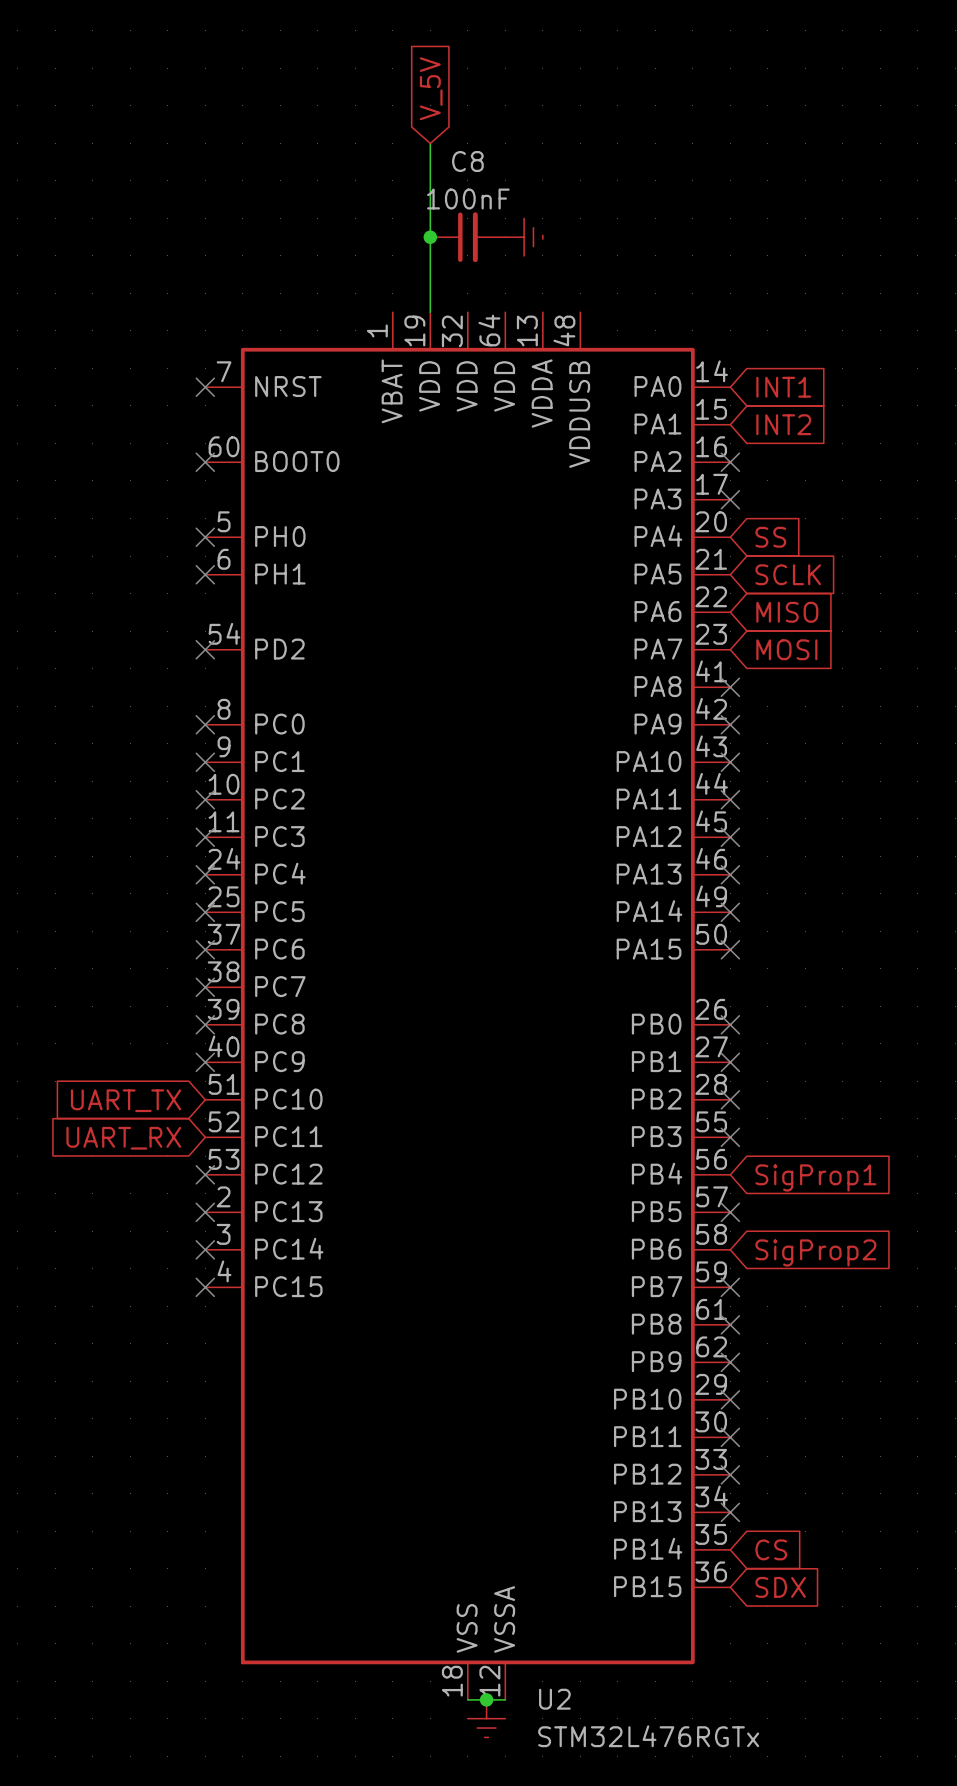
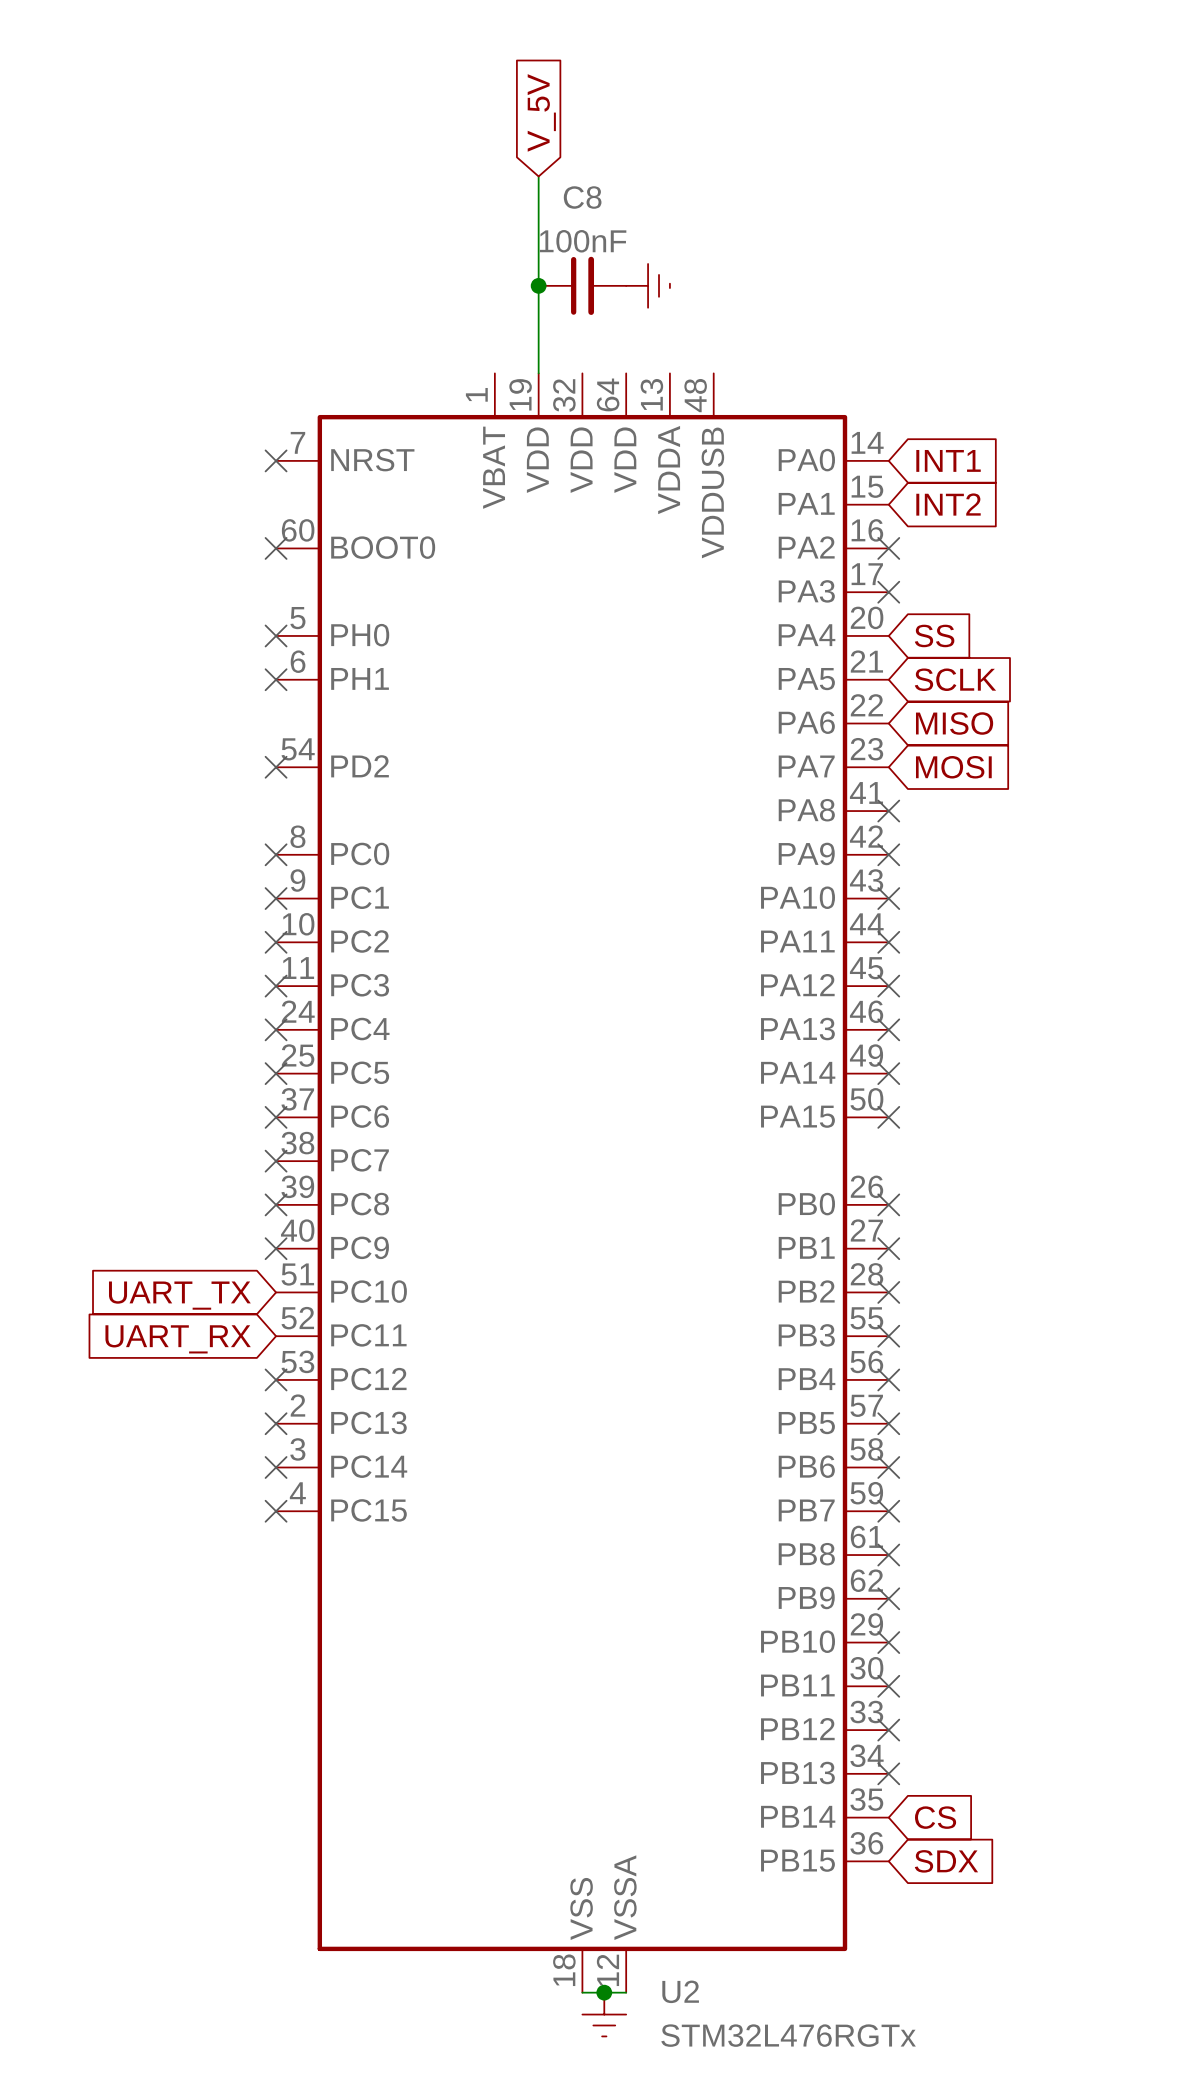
no-connect mark: none -> (888, 1379)
global label: SigProp1 (815, 1177) -> none
no-connect mark: none -> (888, 1467)
global label: SigProp2 (815, 1252) -> none

